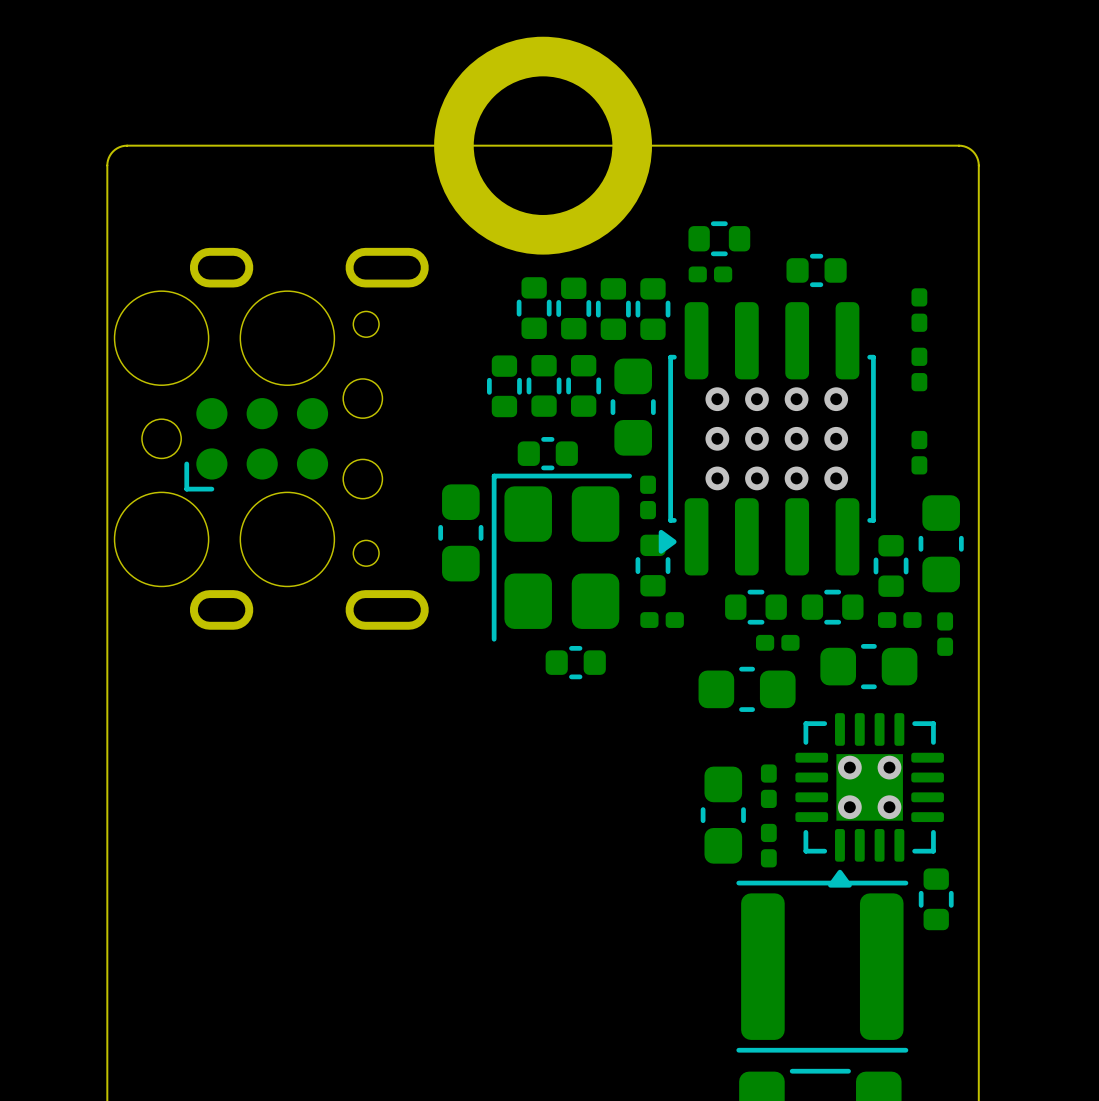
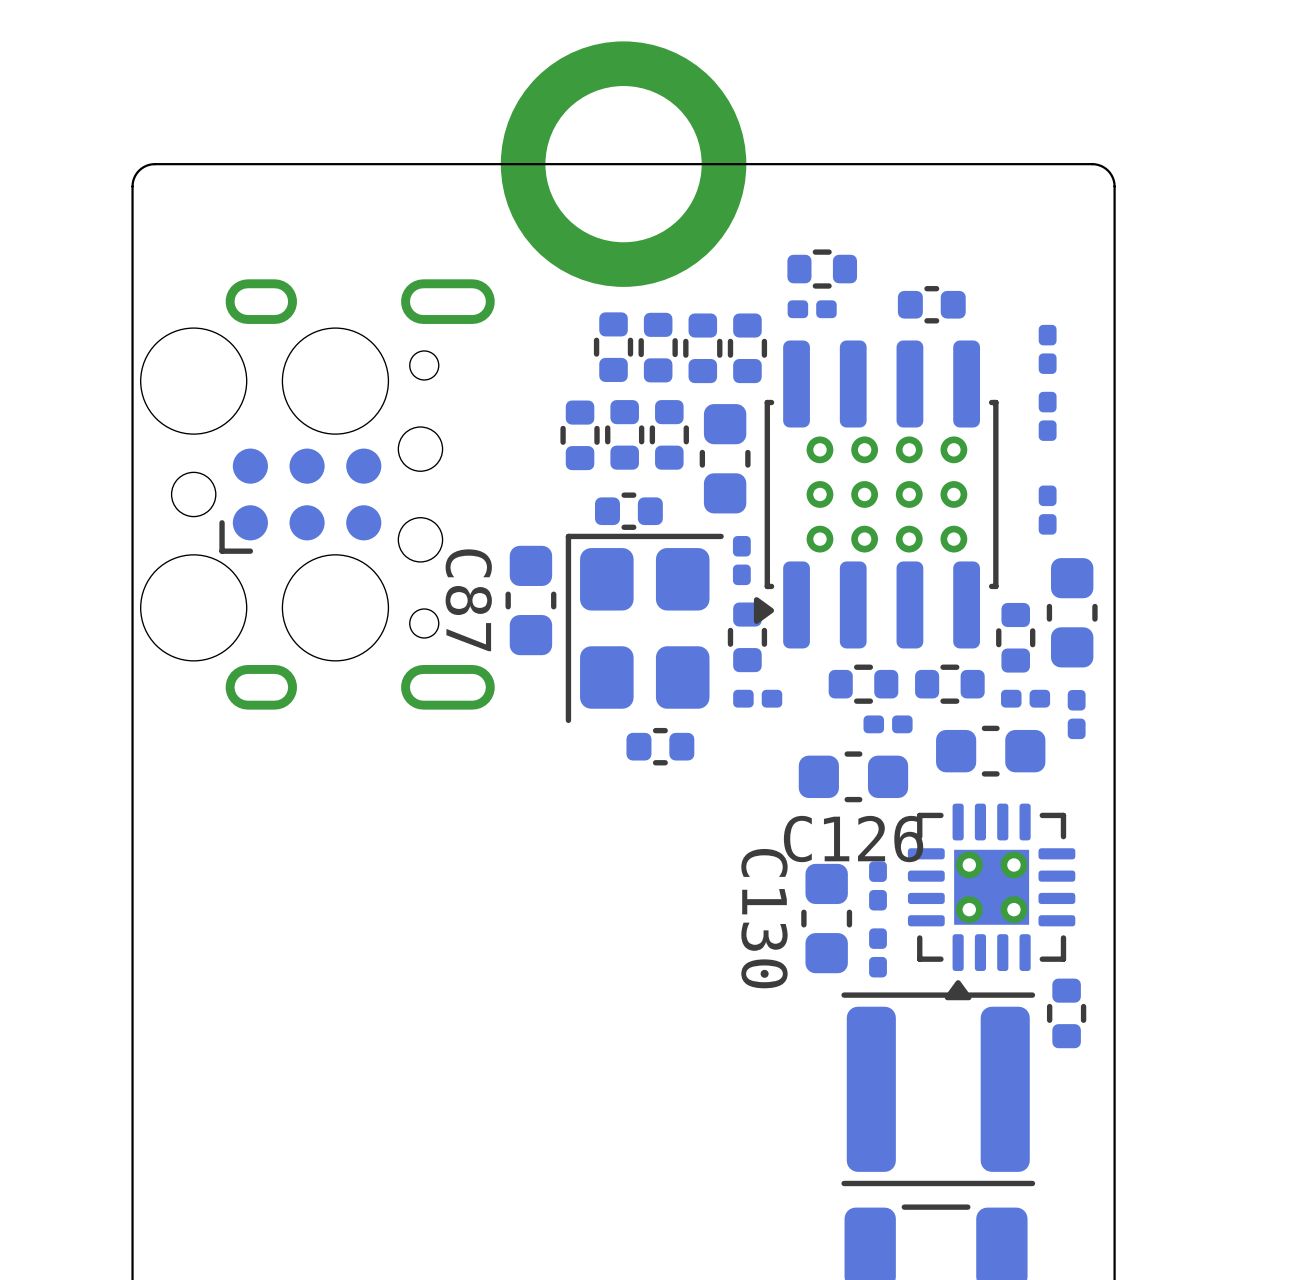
C87 name: none -> C87 (468, 600)
C126 name: none -> C126 (853, 839)
C130 name: none -> C130 (764, 918)

